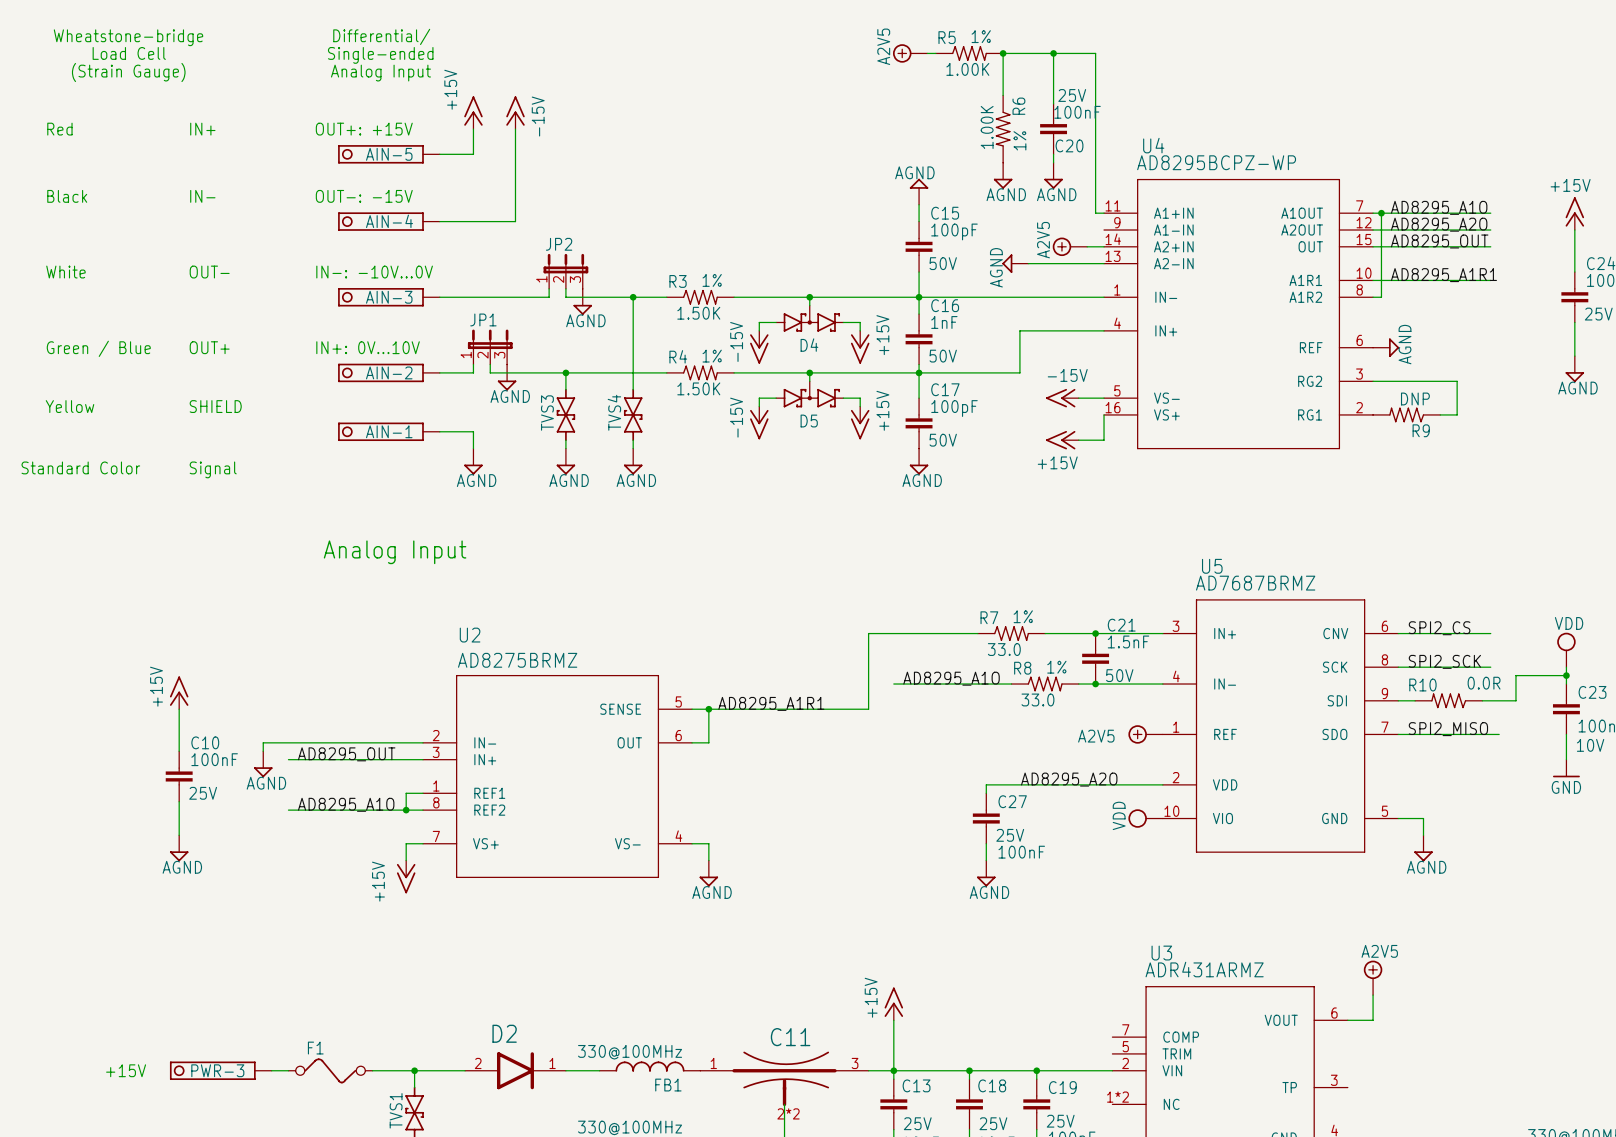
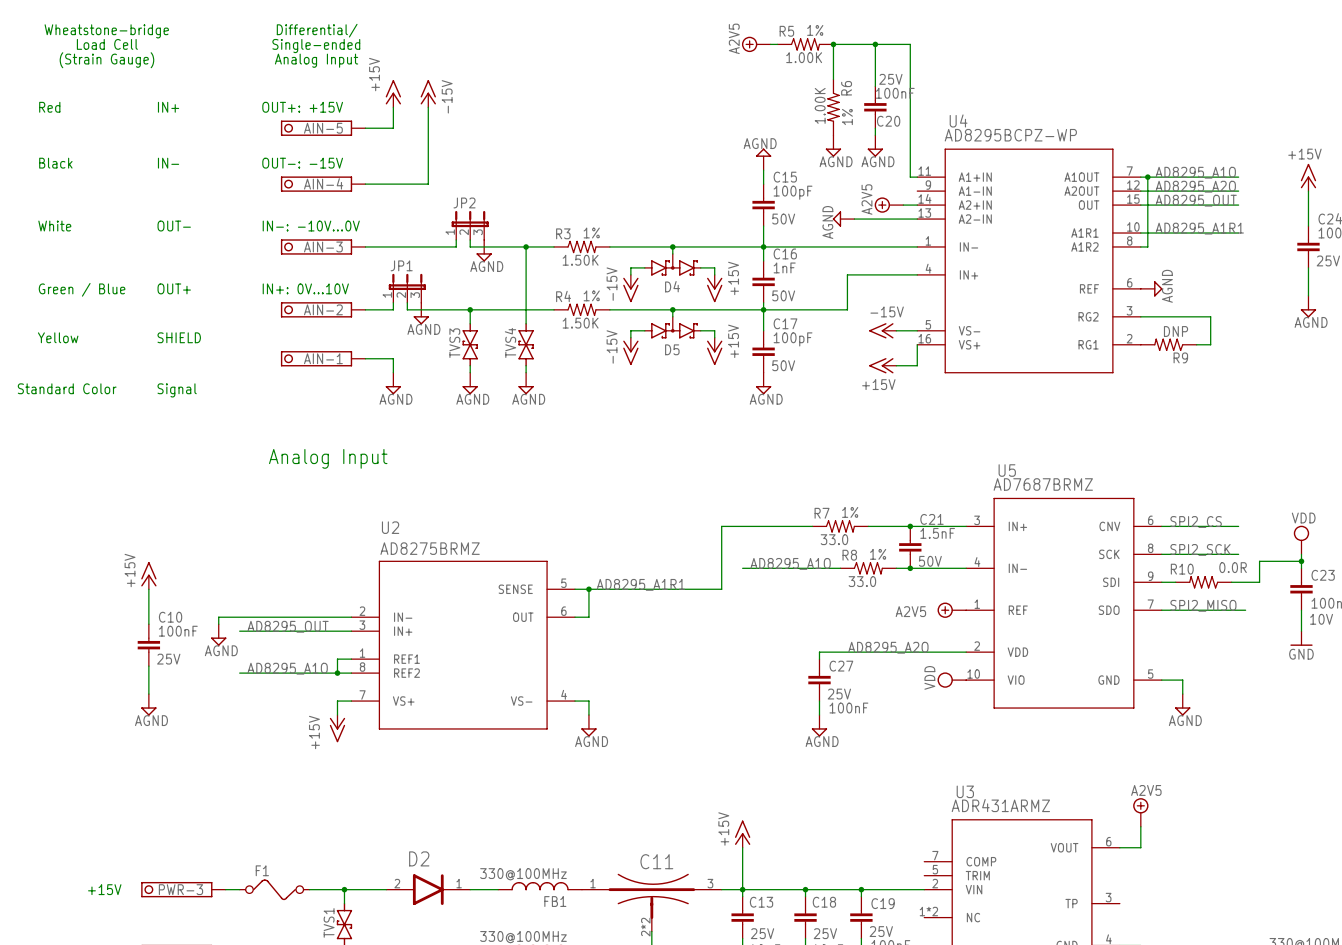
C11 symbol: [700, 1051, 869, 1107] -> [581, 873, 722, 932]

